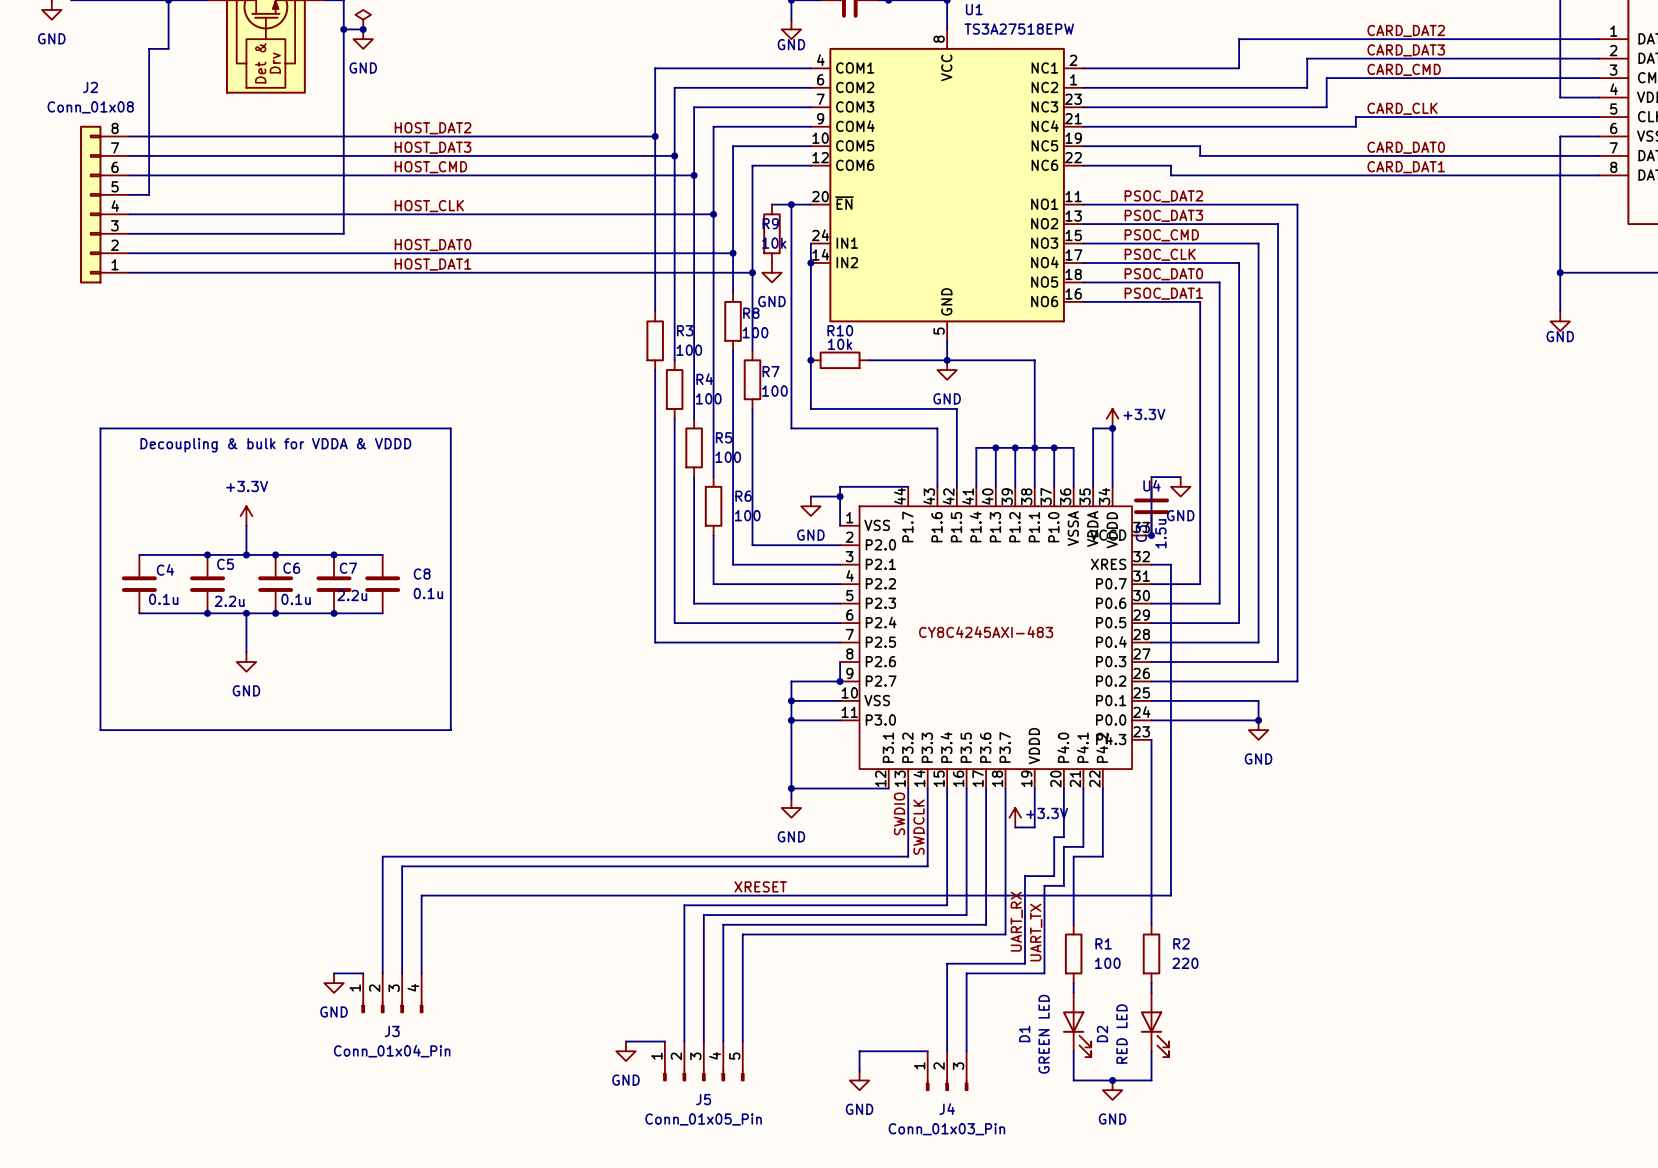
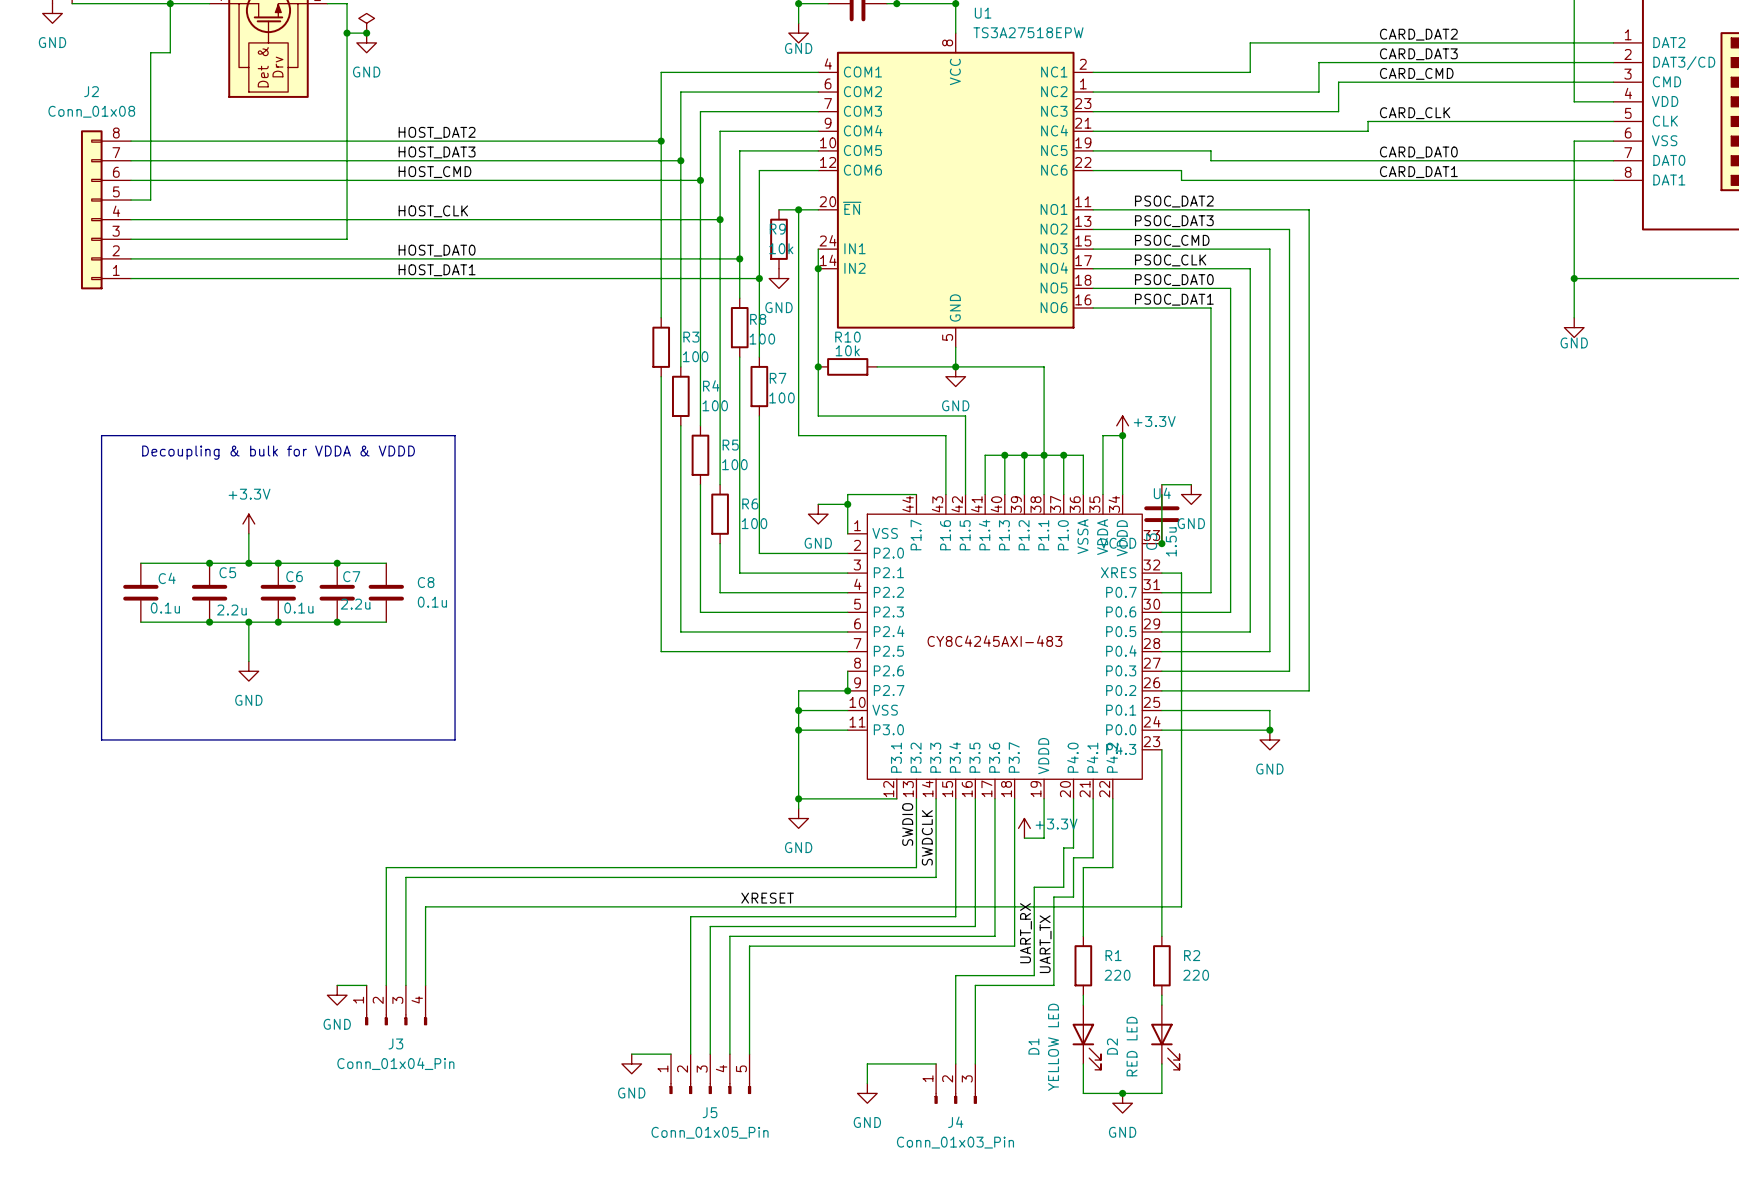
R1 value: 100 (1107, 963) -> 220 (1117, 975)
D1 value: GREEN LED (1044, 1034) -> YELLOW LED (1053, 1047)

